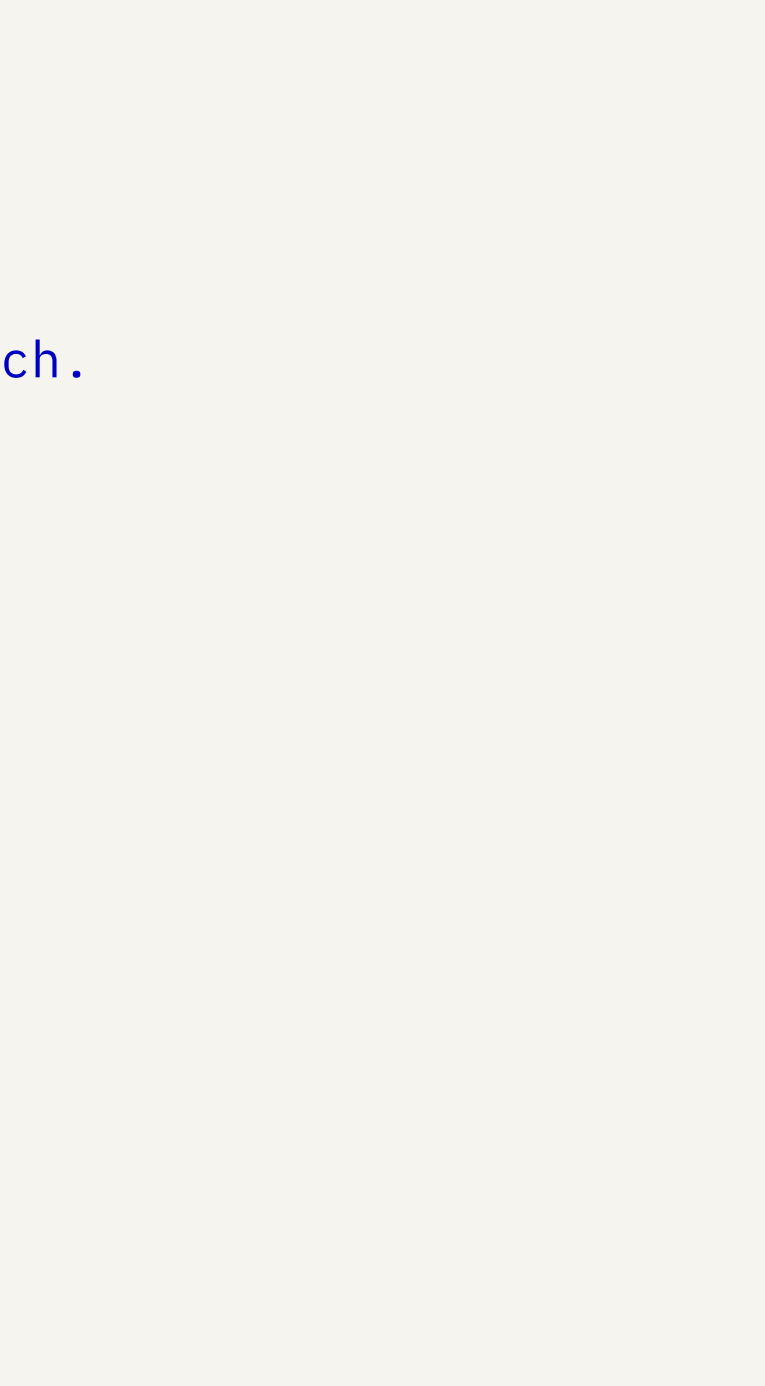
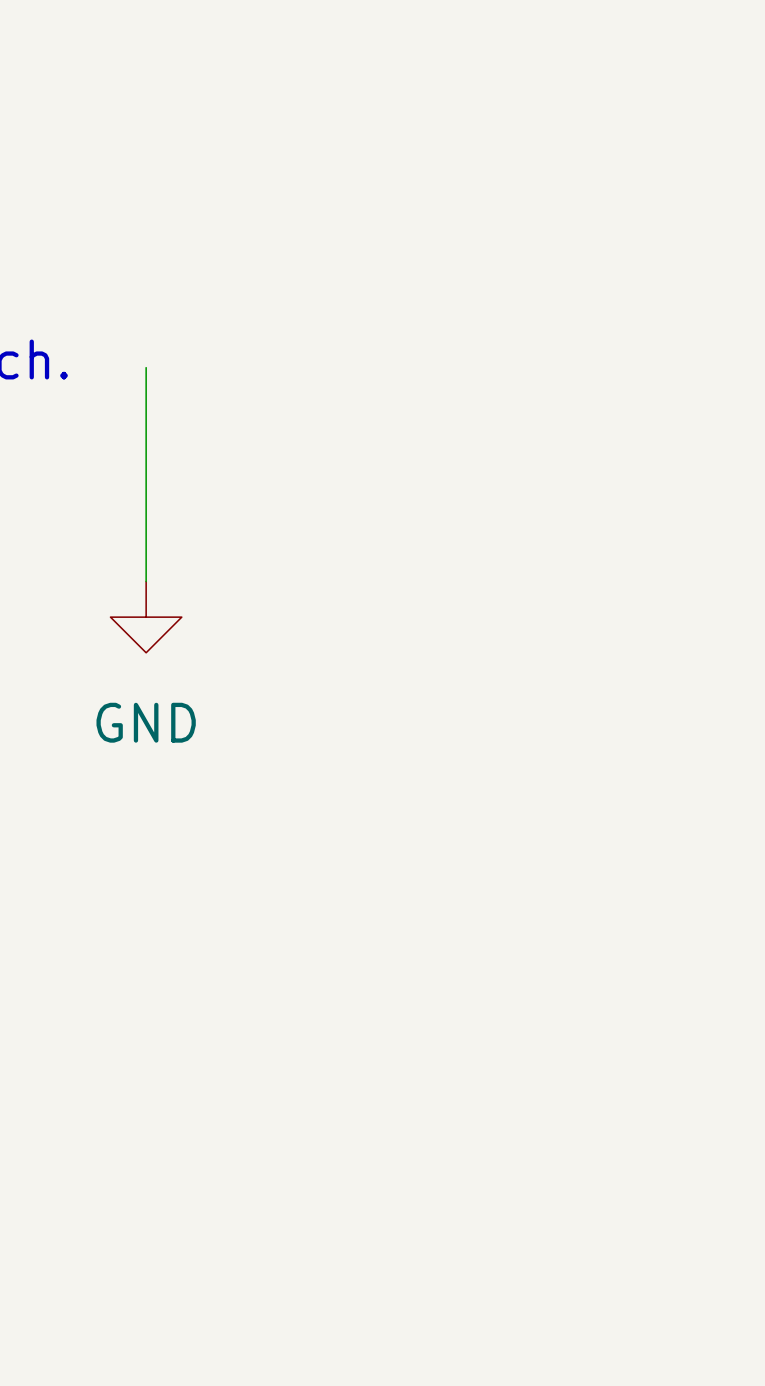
wire: none -> (146, 367) (146, 581)
power symbol: none -> GND (146, 617)

